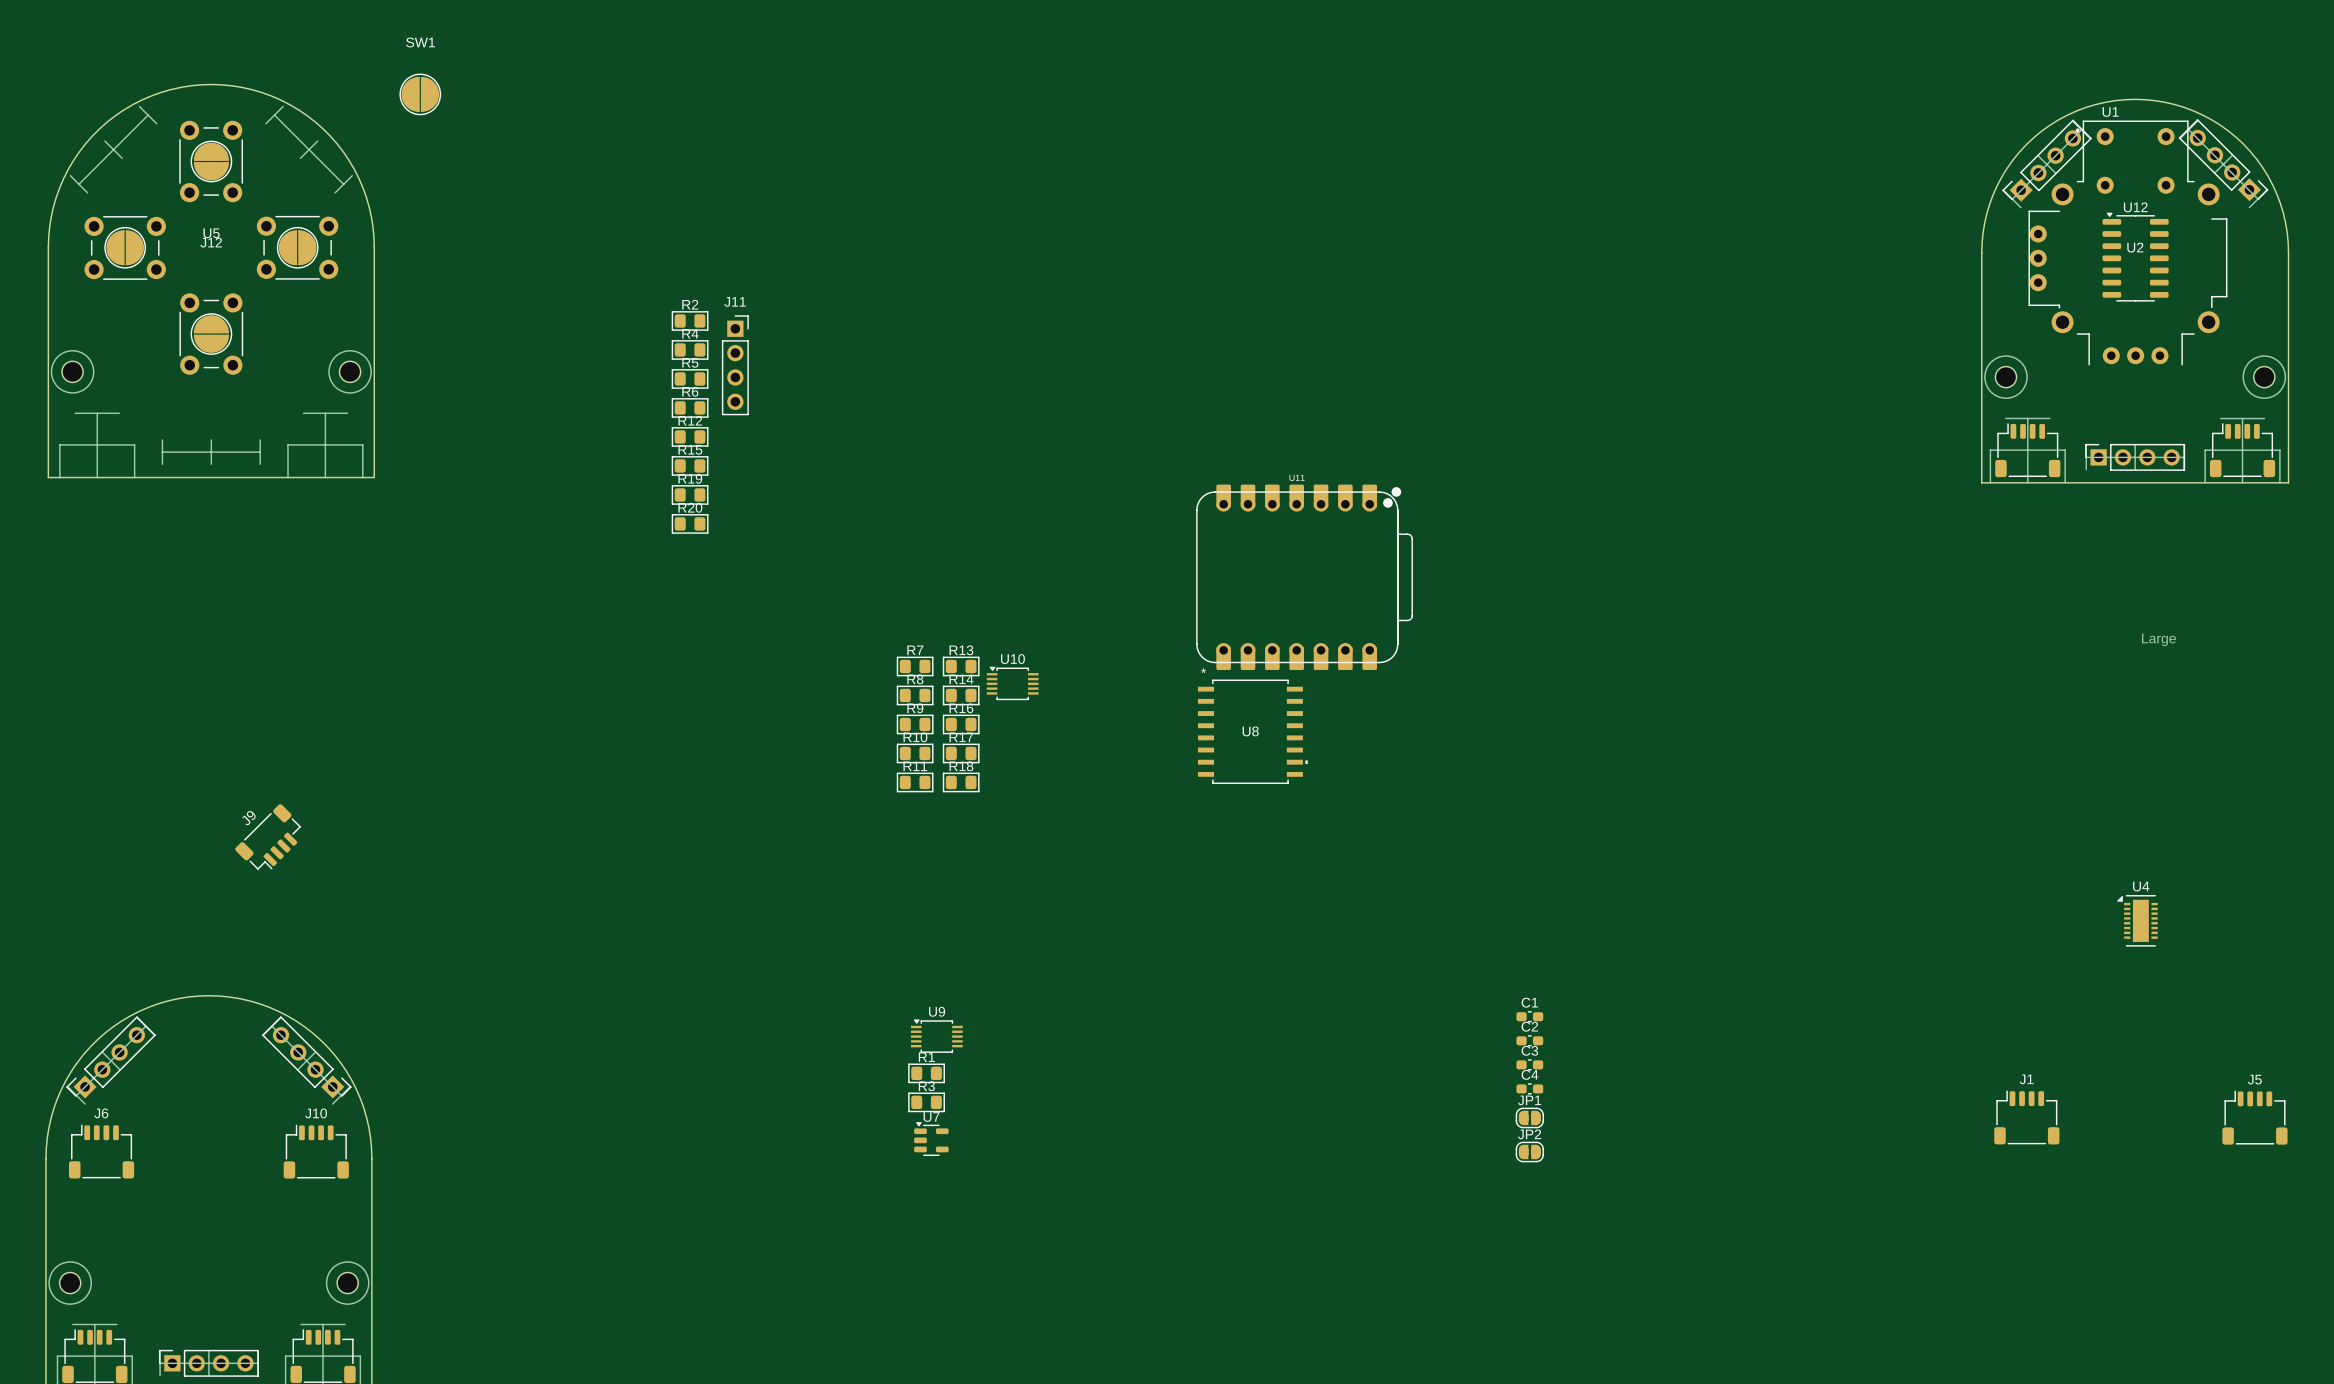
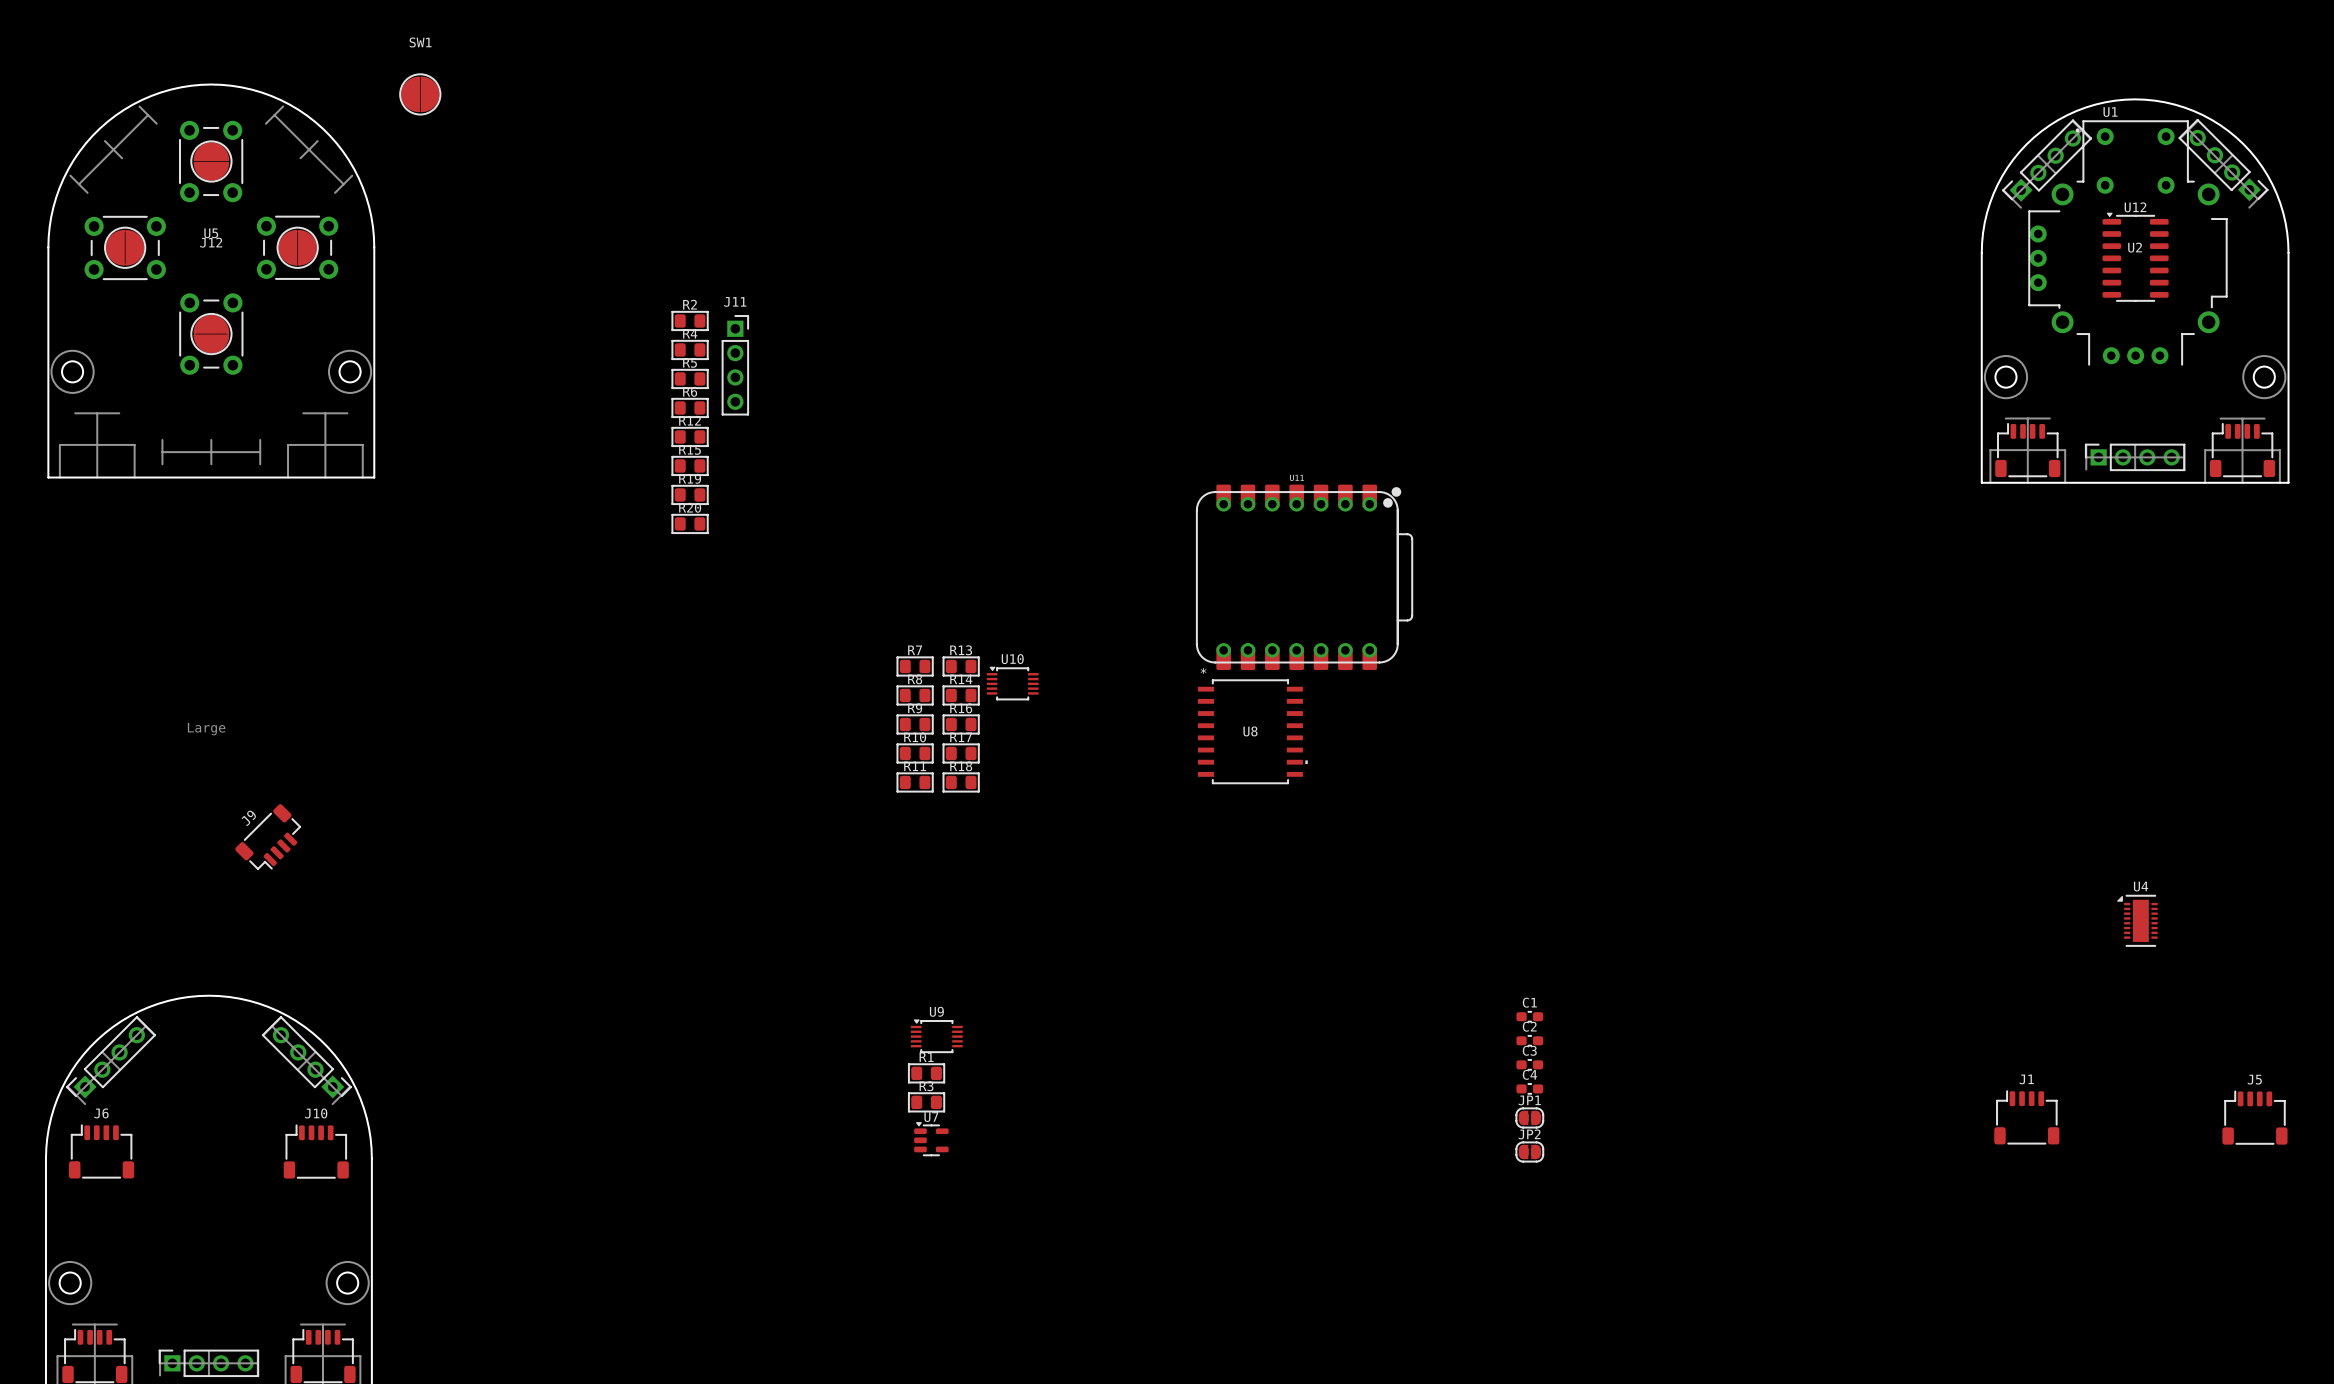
text: Large (2158, 639) -> none
text: none -> Large (206, 729)

